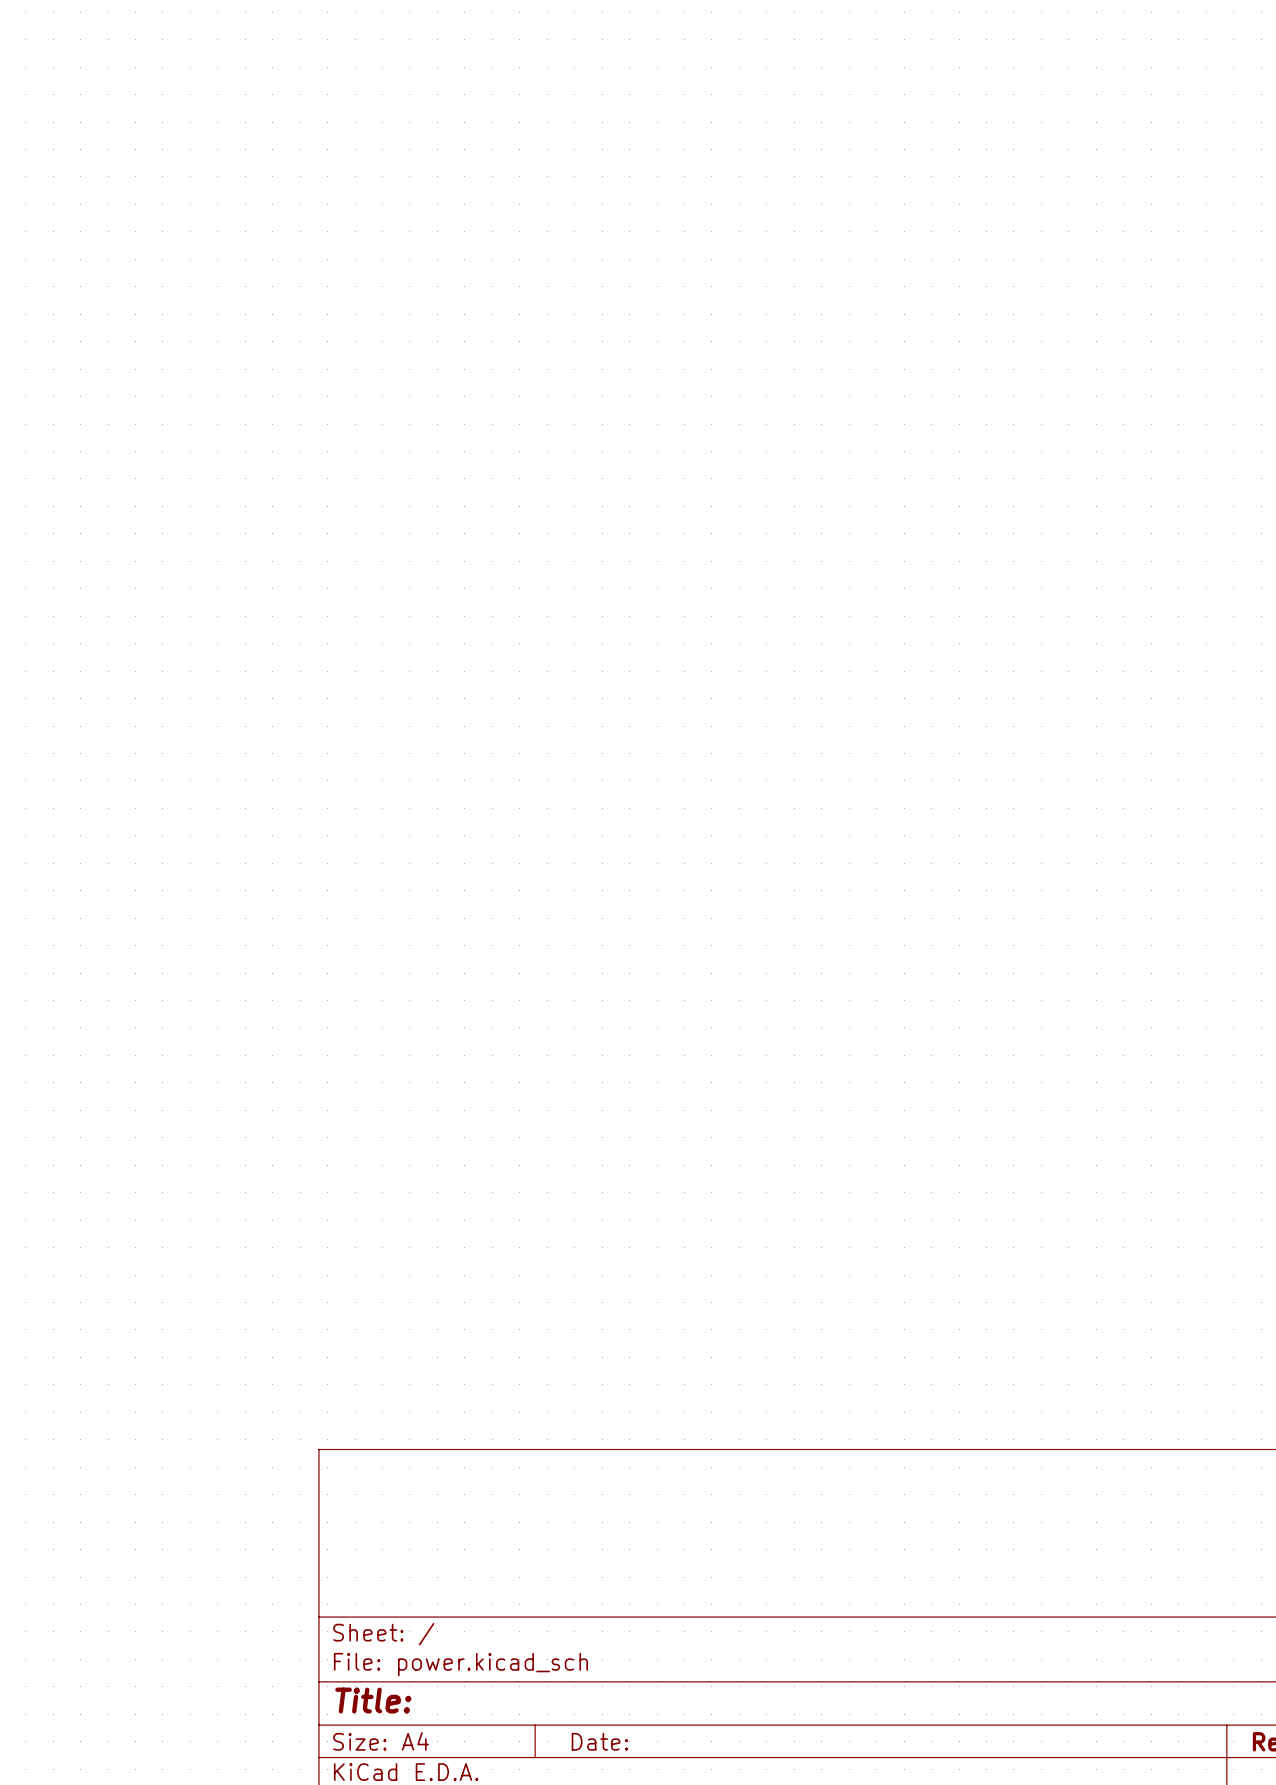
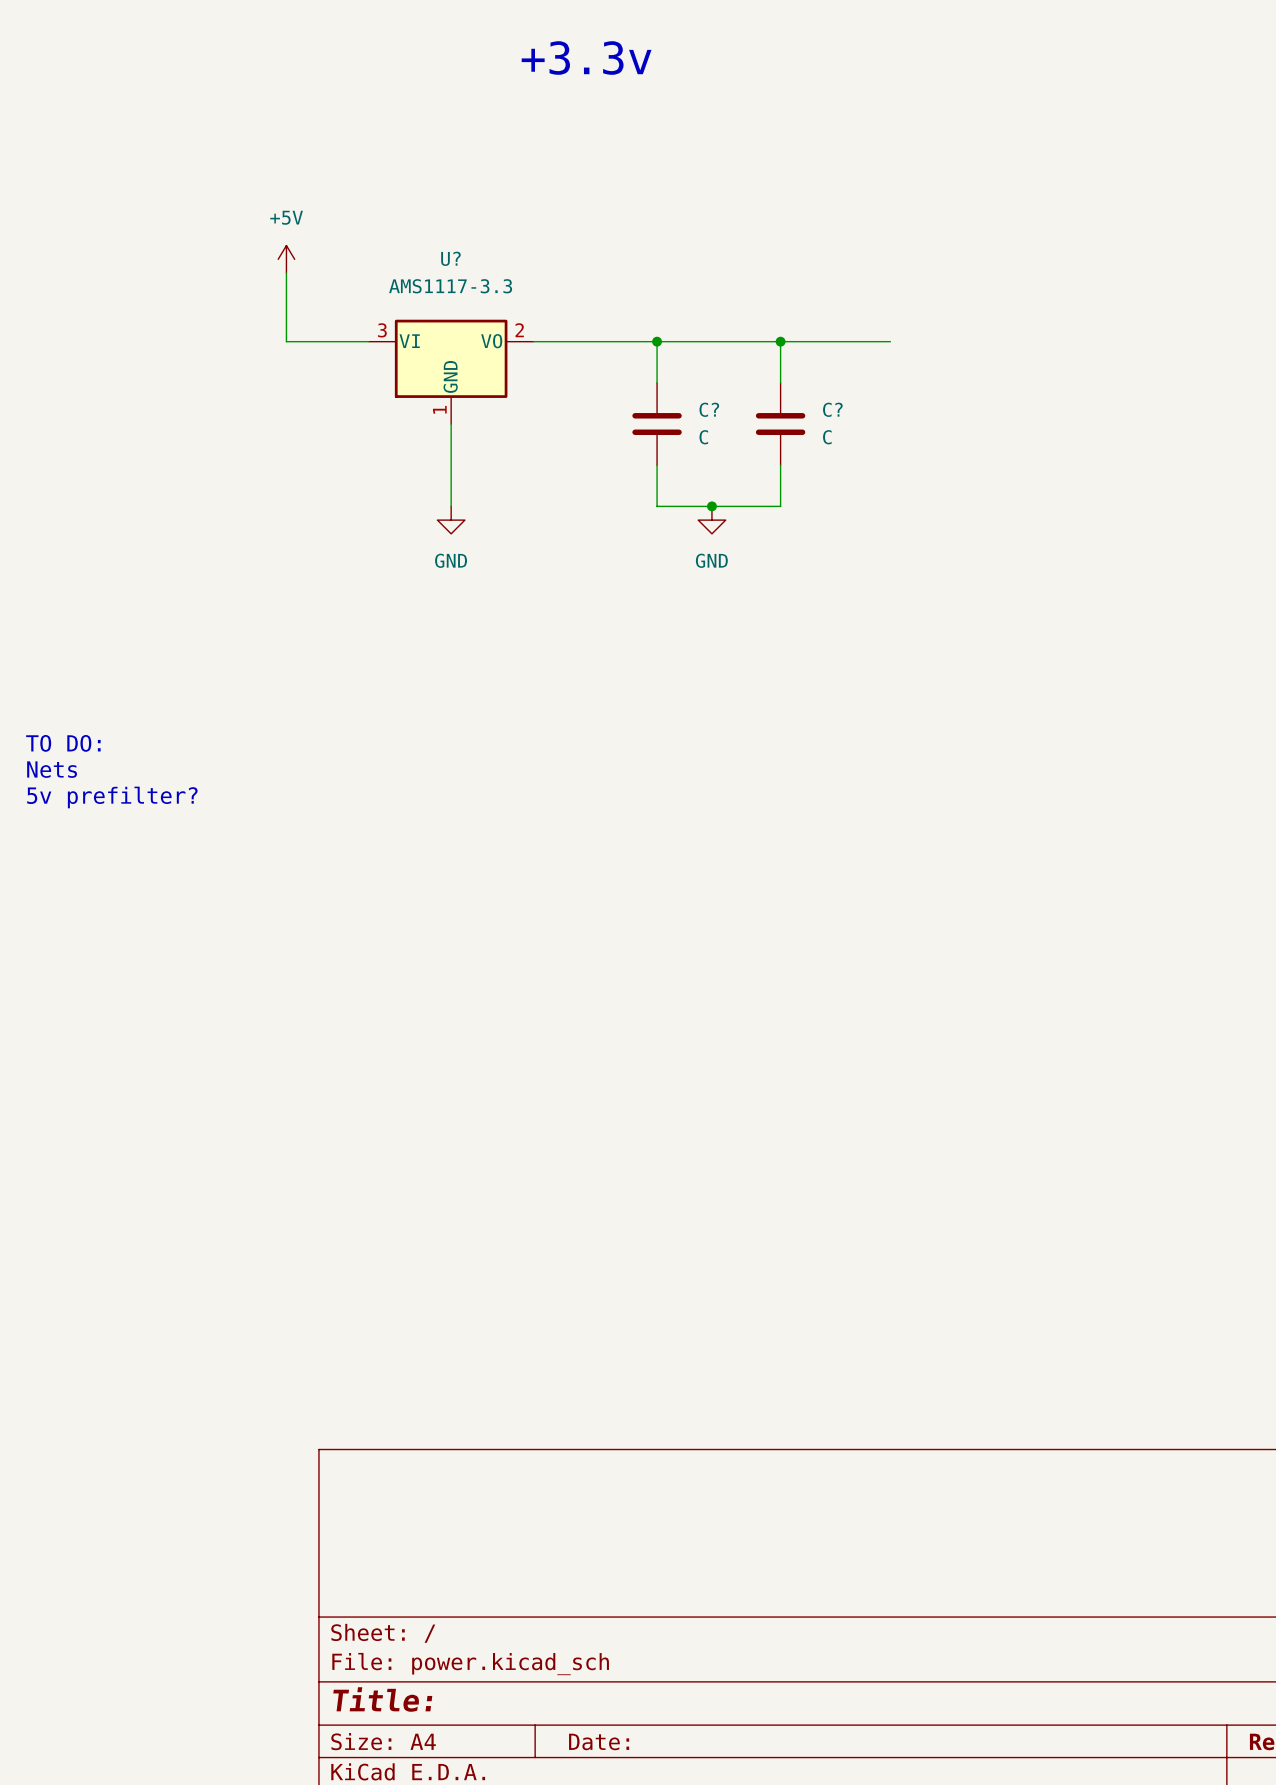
text: none -> +3.3v (586, 58)
power symbol: none -> +5V (286, 259)
wire: none -> (286, 273) (286, 341) (368, 341)
wire: none -> (533, 341) (890, 341)
wire: none -> (657, 341) (657, 382)
junction: none -> (657, 341)
wire: none -> (780, 341) (780, 382)
junction: none -> (780, 341)
U?: none -> AMS1117-3.3 (451, 371)
wire: none -> (451, 424) (451, 506)
C?: none -> C (657, 424)
C?: none -> C (780, 424)
wire: none -> (657, 465) (657, 506) (780, 506) (780, 465)
junction: none -> (711, 506)
power symbol: none -> GND (451, 520)
power symbol: none -> GND (711, 520)
text: none -> TO DO: (63, 743)
text: none -> Nets (52, 769)
text: none -> 5v prefilter? (112, 797)

